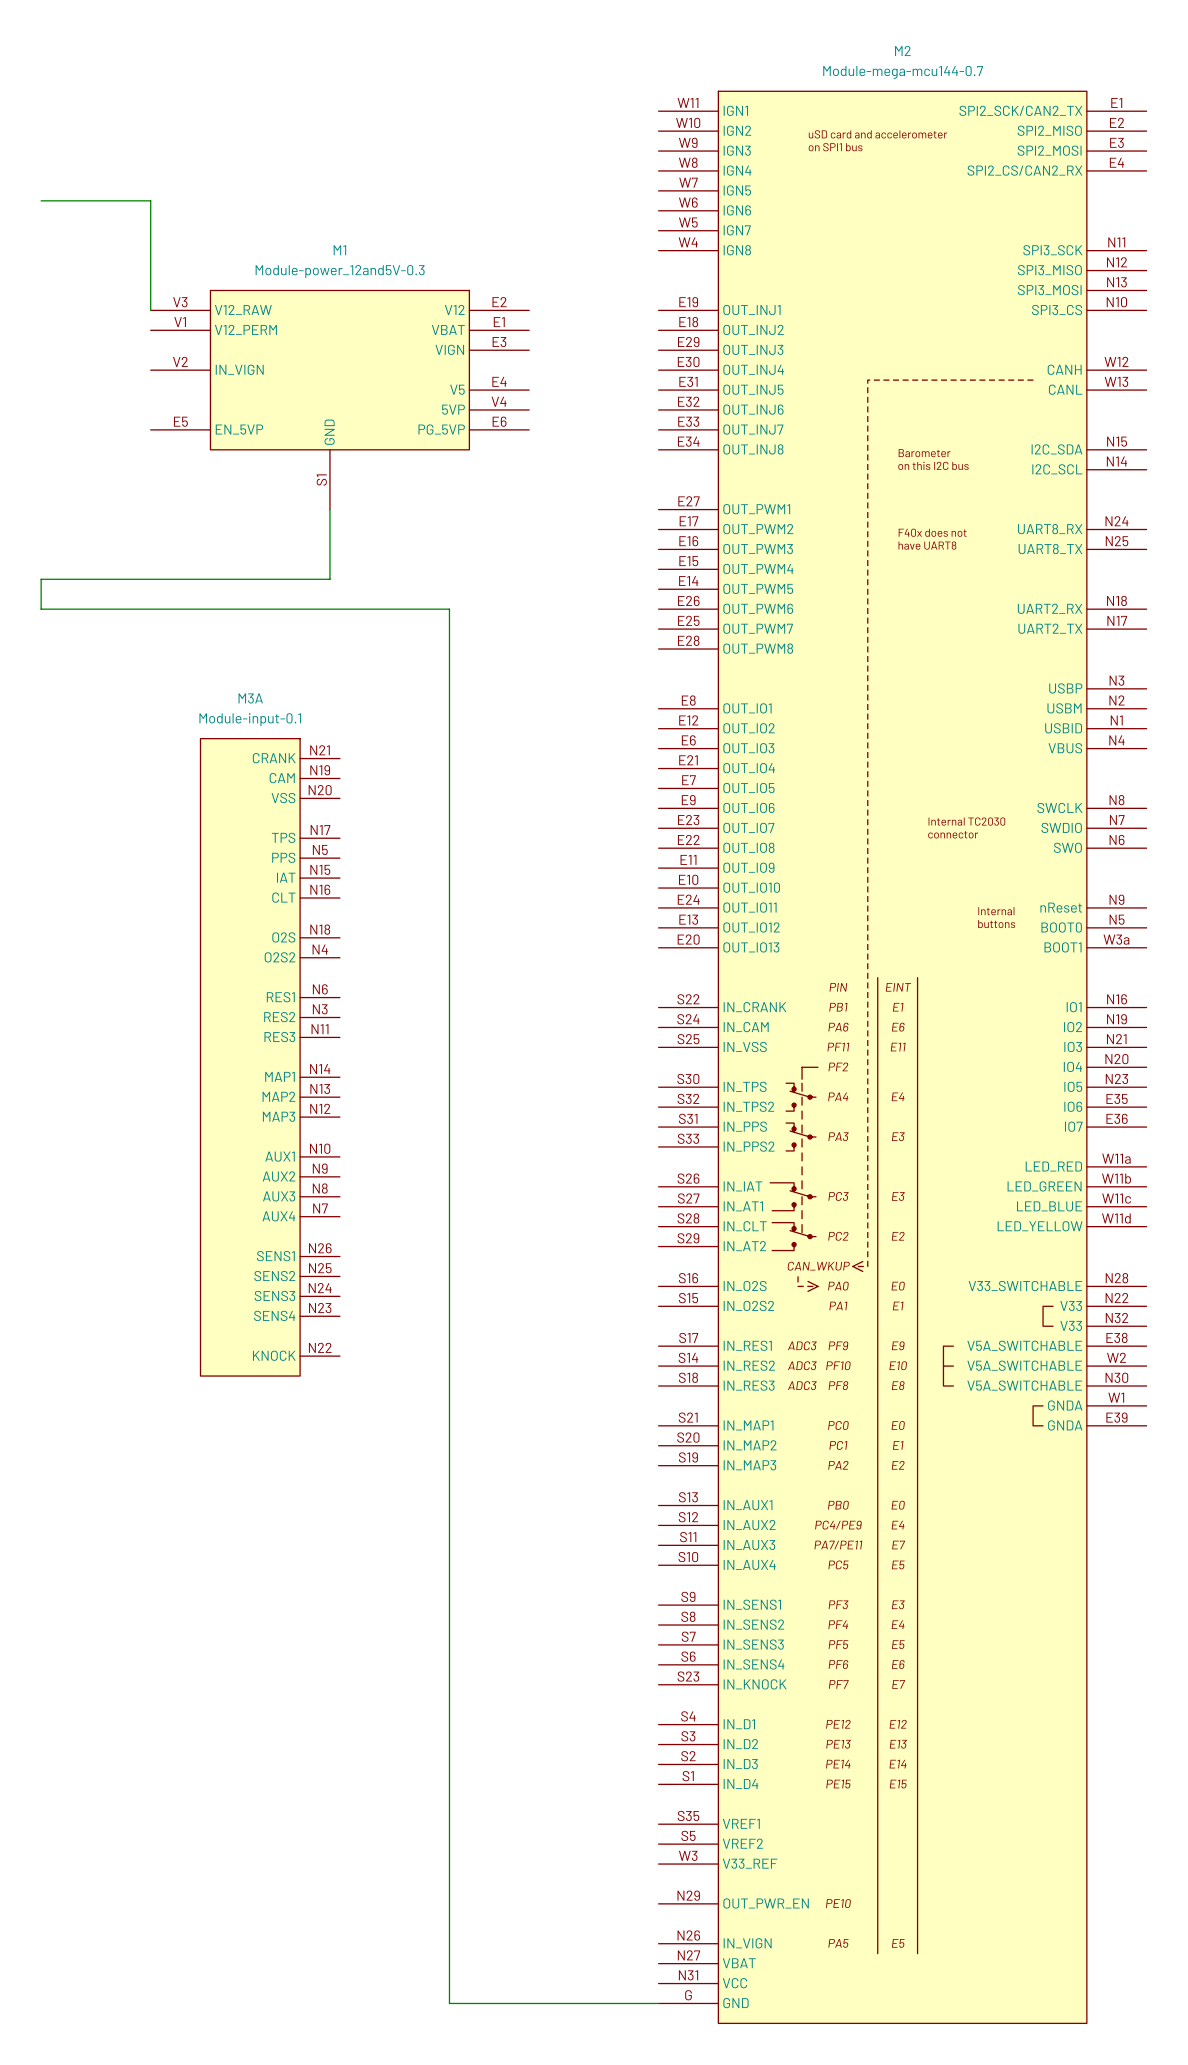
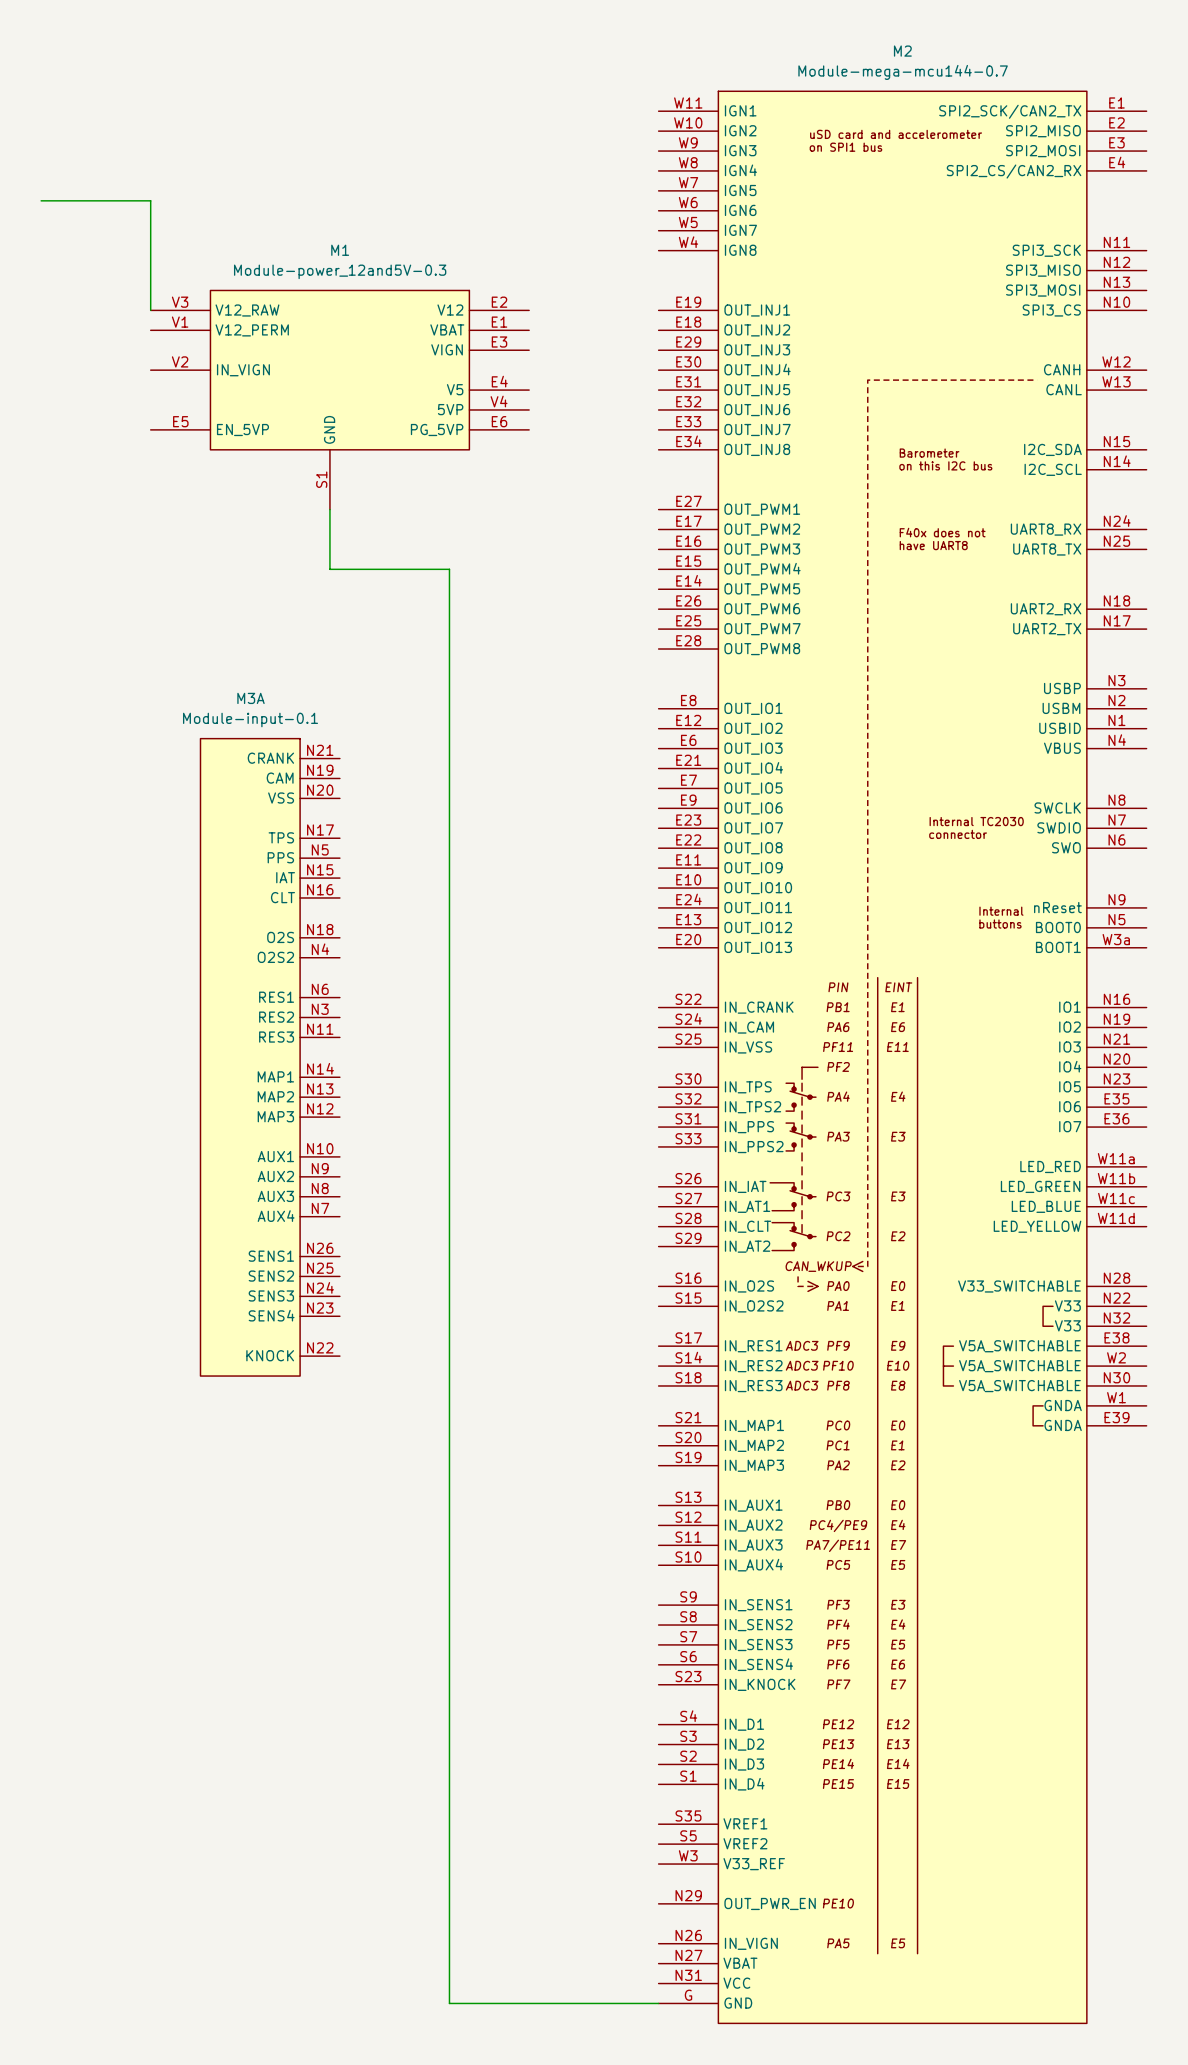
wire: (329, 569) (329, 579) (41, 579) (41, 609) (449, 609) -> (329, 569) (449, 569) (449, 609)

